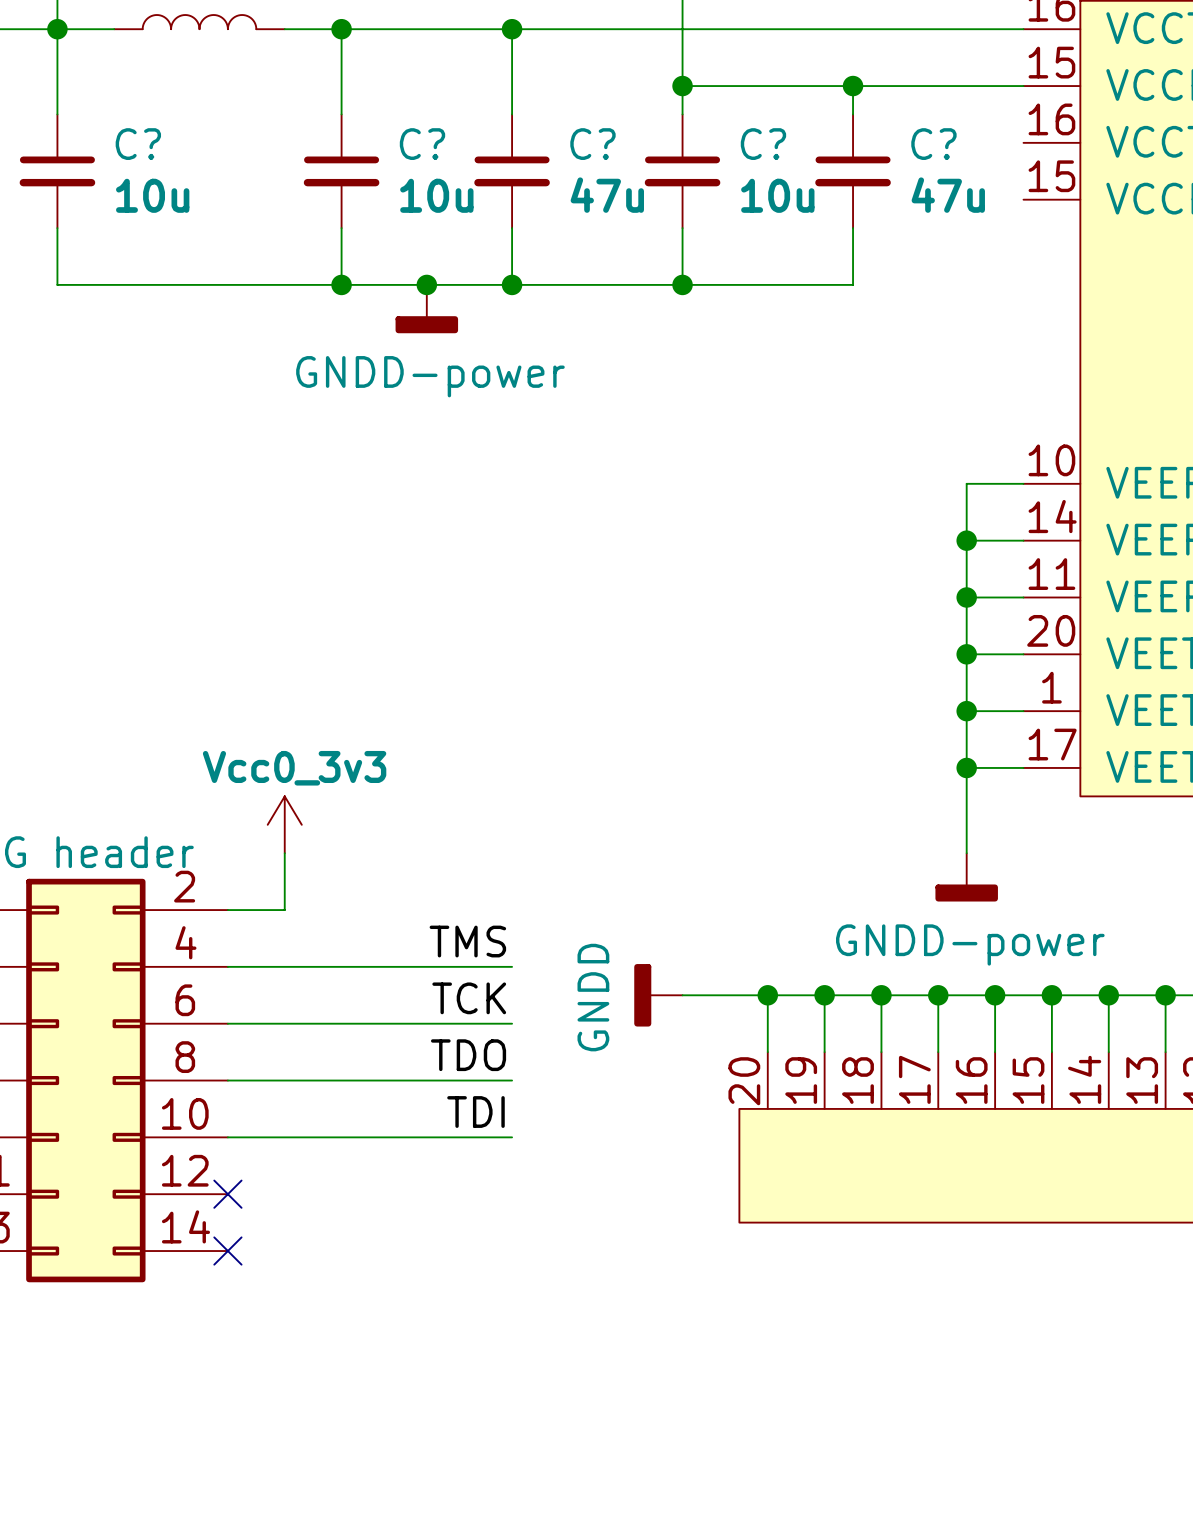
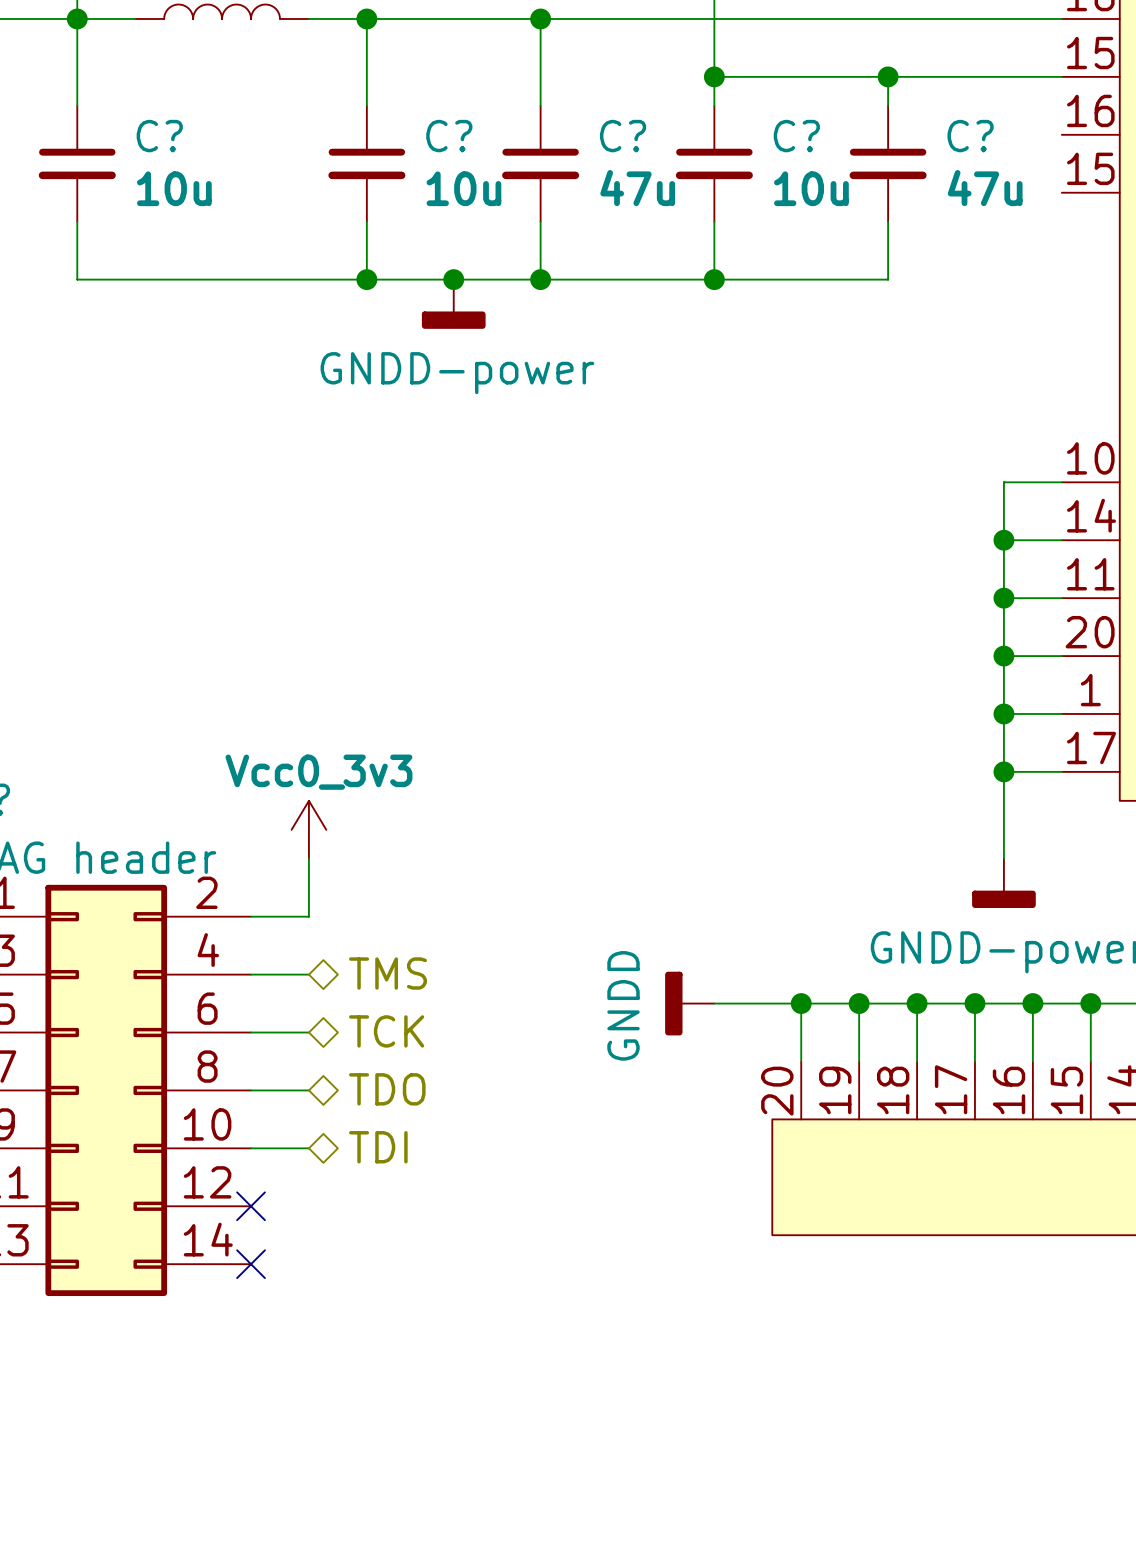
label: TMS (467, 941) -> none
hierarchical label: none -> TMS (388, 973)
wire: (284, 966) (512, 966) -> none
label: TCK (469, 998) -> none
hierarchical label: none -> TCK (386, 1031)
wire: (284, 1023) (512, 1023) -> none
label: TDO (468, 1055) -> none
hierarchical label: none -> TDO (387, 1089)
wire: (284, 1080) (512, 1080) -> none
label: TDI (475, 1112) -> none
hierarchical label: none -> TDI (378, 1147)
wire: (284, 1137) (512, 1137) -> none

